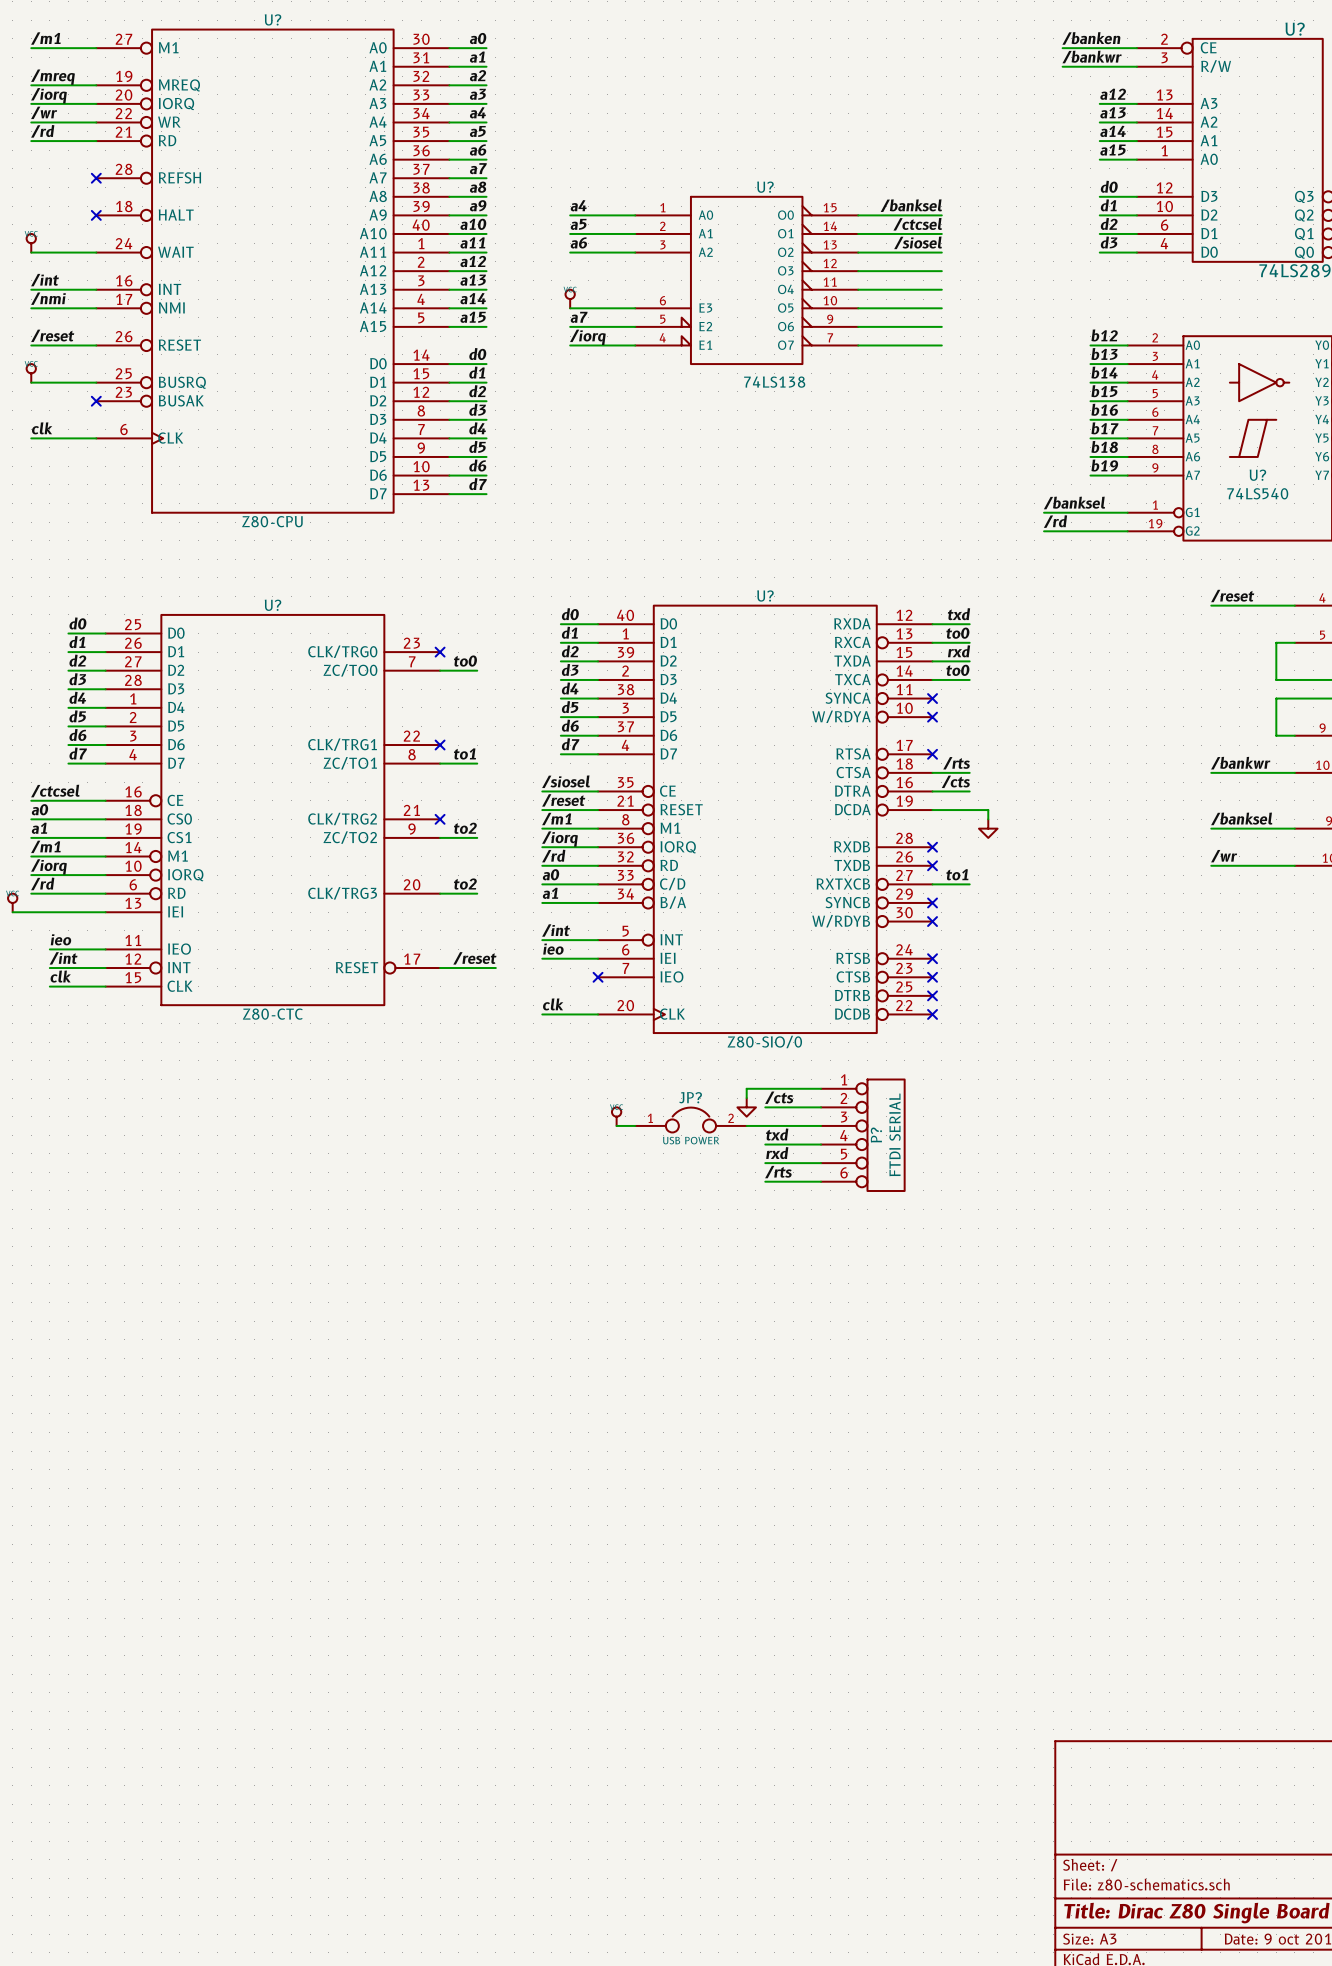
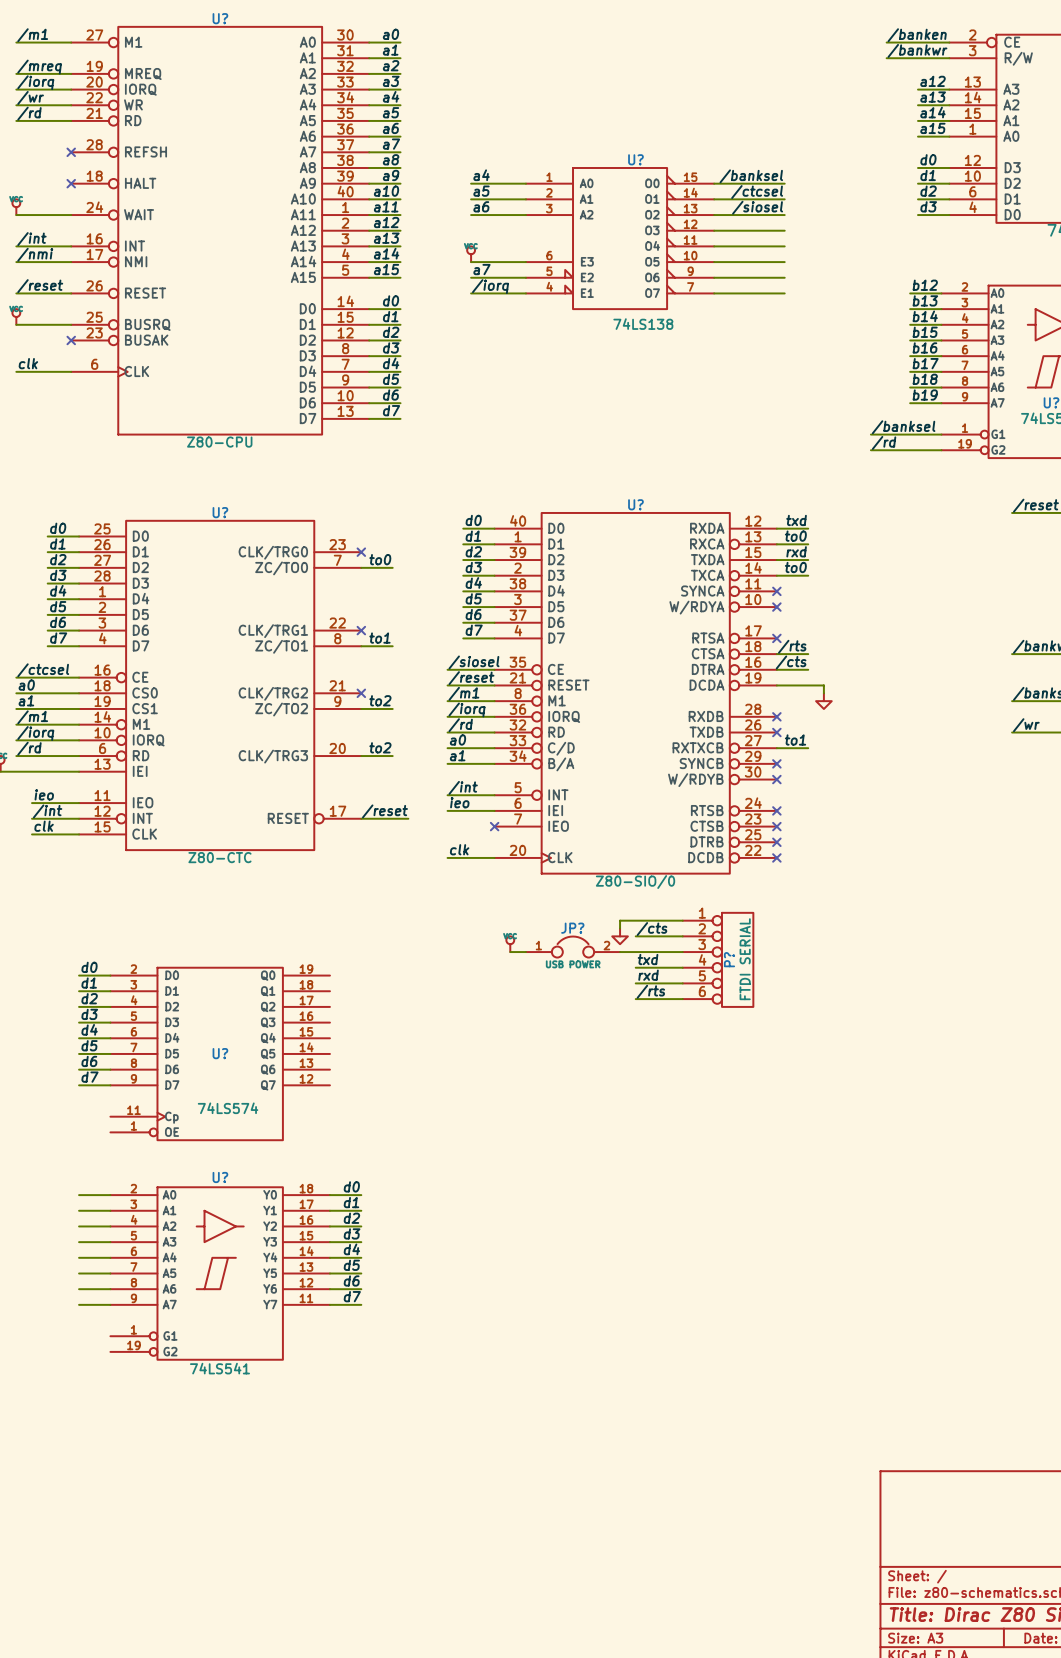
label: none -> d0 (89, 967)
wire: none -> (79, 975) (110, 975)
label: none -> d1 (89, 983)
wire: none -> (79, 991) (110, 991)
label: none -> d2 (89, 998)
wire: none -> (79, 1006) (110, 1006)
label: none -> d3 (89, 1014)
wire: none -> (79, 1022) (110, 1022)
label: none -> d4 (89, 1029)
wire: none -> (79, 1038) (110, 1038)
label: none -> d5 (89, 1045)
wire: none -> (79, 1053) (110, 1053)
U?: none -> 74LS574 (220, 1053)
label: none -> d6 (89, 1061)
wire: none -> (79, 1069) (110, 1069)
label: none -> d7 (89, 1077)
wire: none -> (79, 1085) (110, 1085)
label: none -> d0 (351, 1186)
wire: none -> (79, 1195) (110, 1195)
wire: none -> (329, 1195) (361, 1195)
label: none -> d1 (351, 1202)
wire: none -> (79, 1210) (110, 1210)
wire: none -> (329, 1210) (361, 1210)
label: none -> d2 (351, 1218)
wire: none -> (79, 1226) (110, 1226)
wire: none -> (329, 1226) (361, 1226)
label: none -> d3 (352, 1233)
wire: none -> (79, 1242) (110, 1242)
wire: none -> (329, 1242) (361, 1242)
label: none -> d4 (351, 1249)
wire: none -> (79, 1257) (110, 1257)
wire: none -> (329, 1257) (361, 1257)
label: none -> d5 (351, 1265)
wire: none -> (79, 1273) (110, 1273)
U?: none -> 74LS541 (220, 1273)
wire: none -> (329, 1273) (361, 1273)
label: none -> d6 (351, 1280)
wire: none -> (79, 1289) (110, 1289)
wire: none -> (329, 1289) (361, 1289)
label: none -> d7 (352, 1296)
wire: none -> (79, 1304) (110, 1304)
wire: none -> (329, 1304) (361, 1304)

